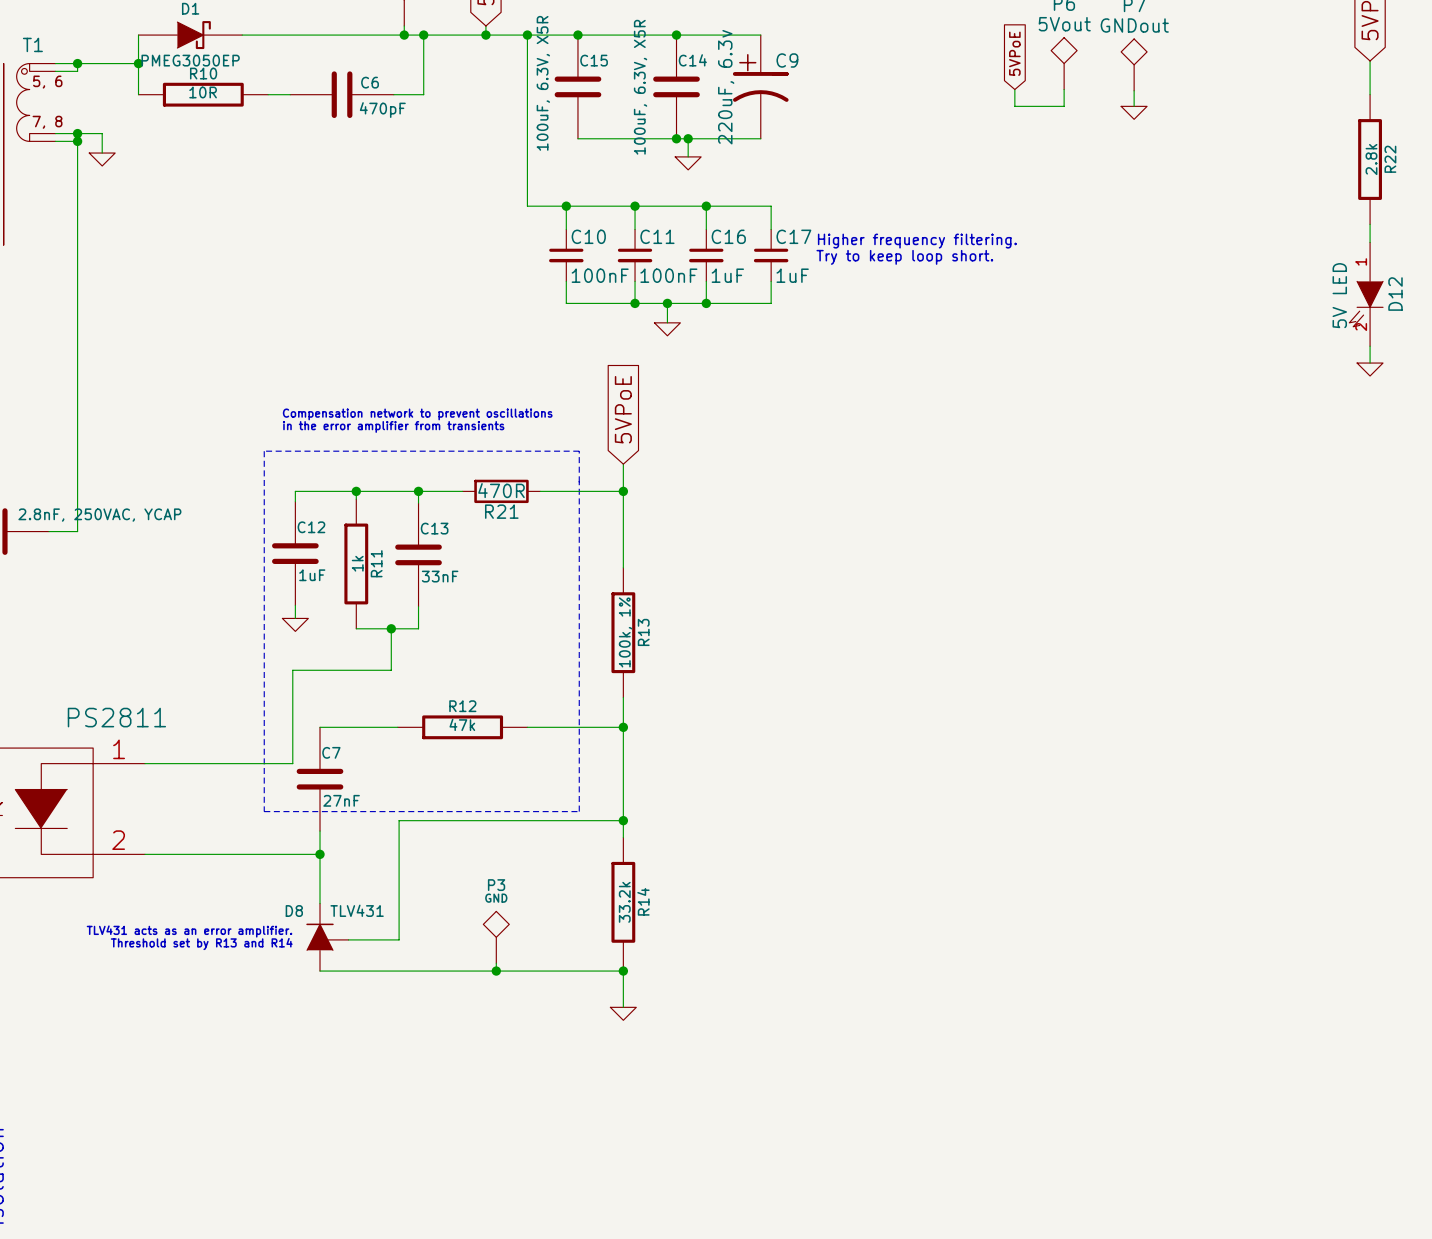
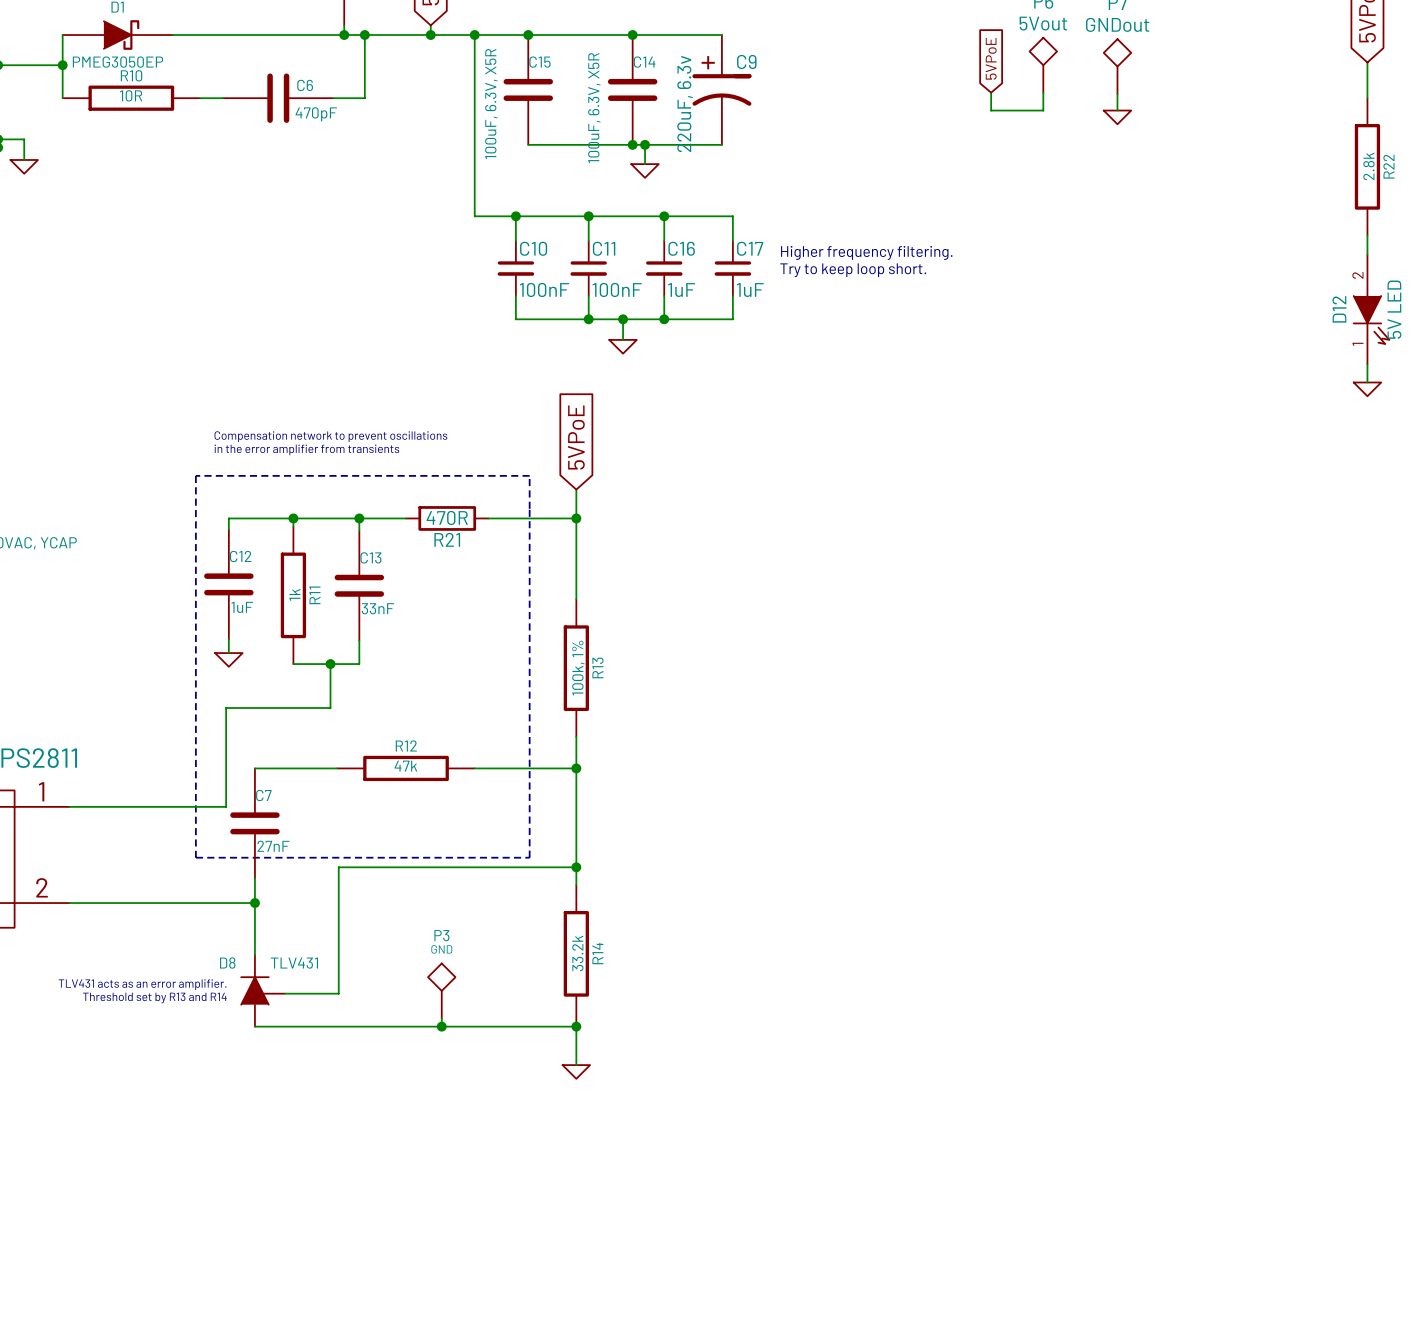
D12 symbol: [1349, 242, 1384, 347] -> [1353, 254, 1390, 365]
D12 name position: D12 (1395, 294) -> D12 (1339, 309)
D12 value position: 5V LED (1339, 295) -> 5V LED (1394, 309)

